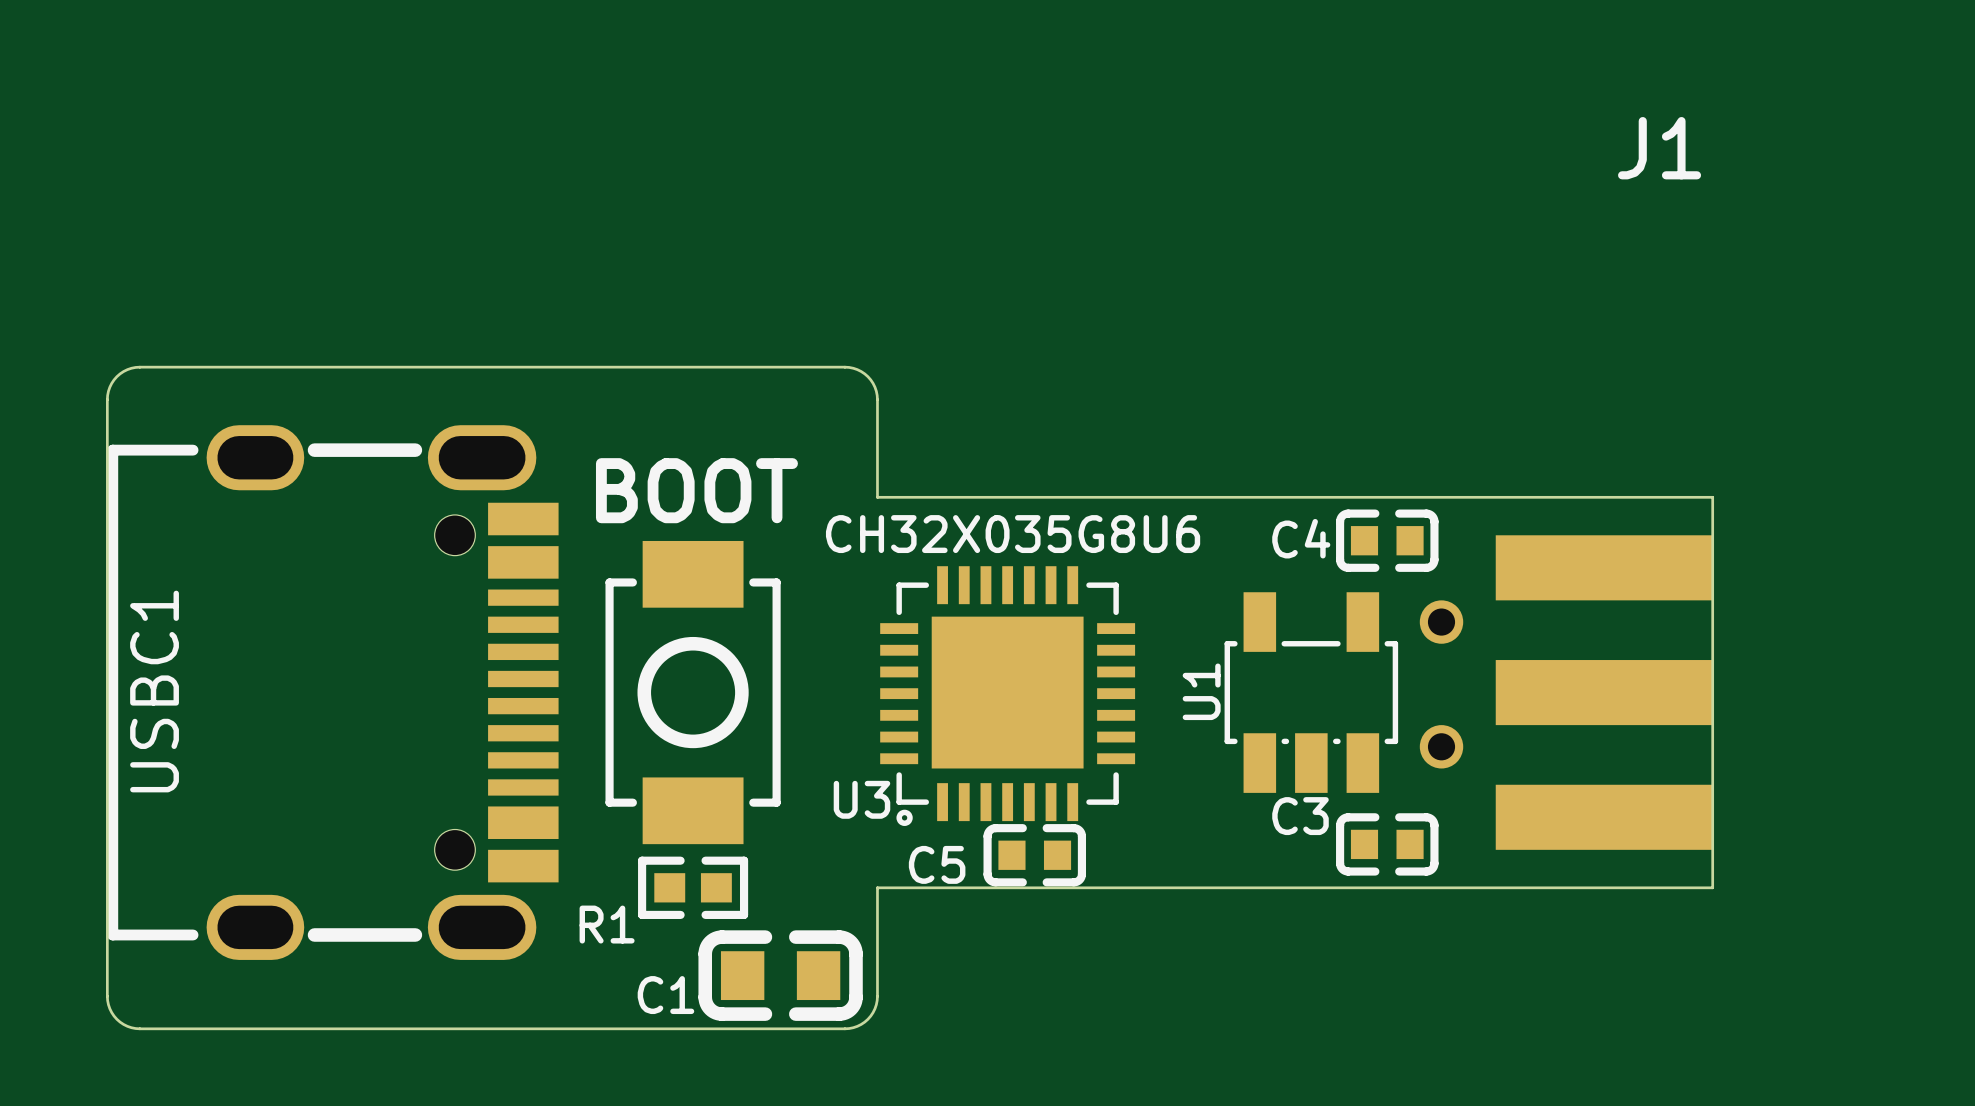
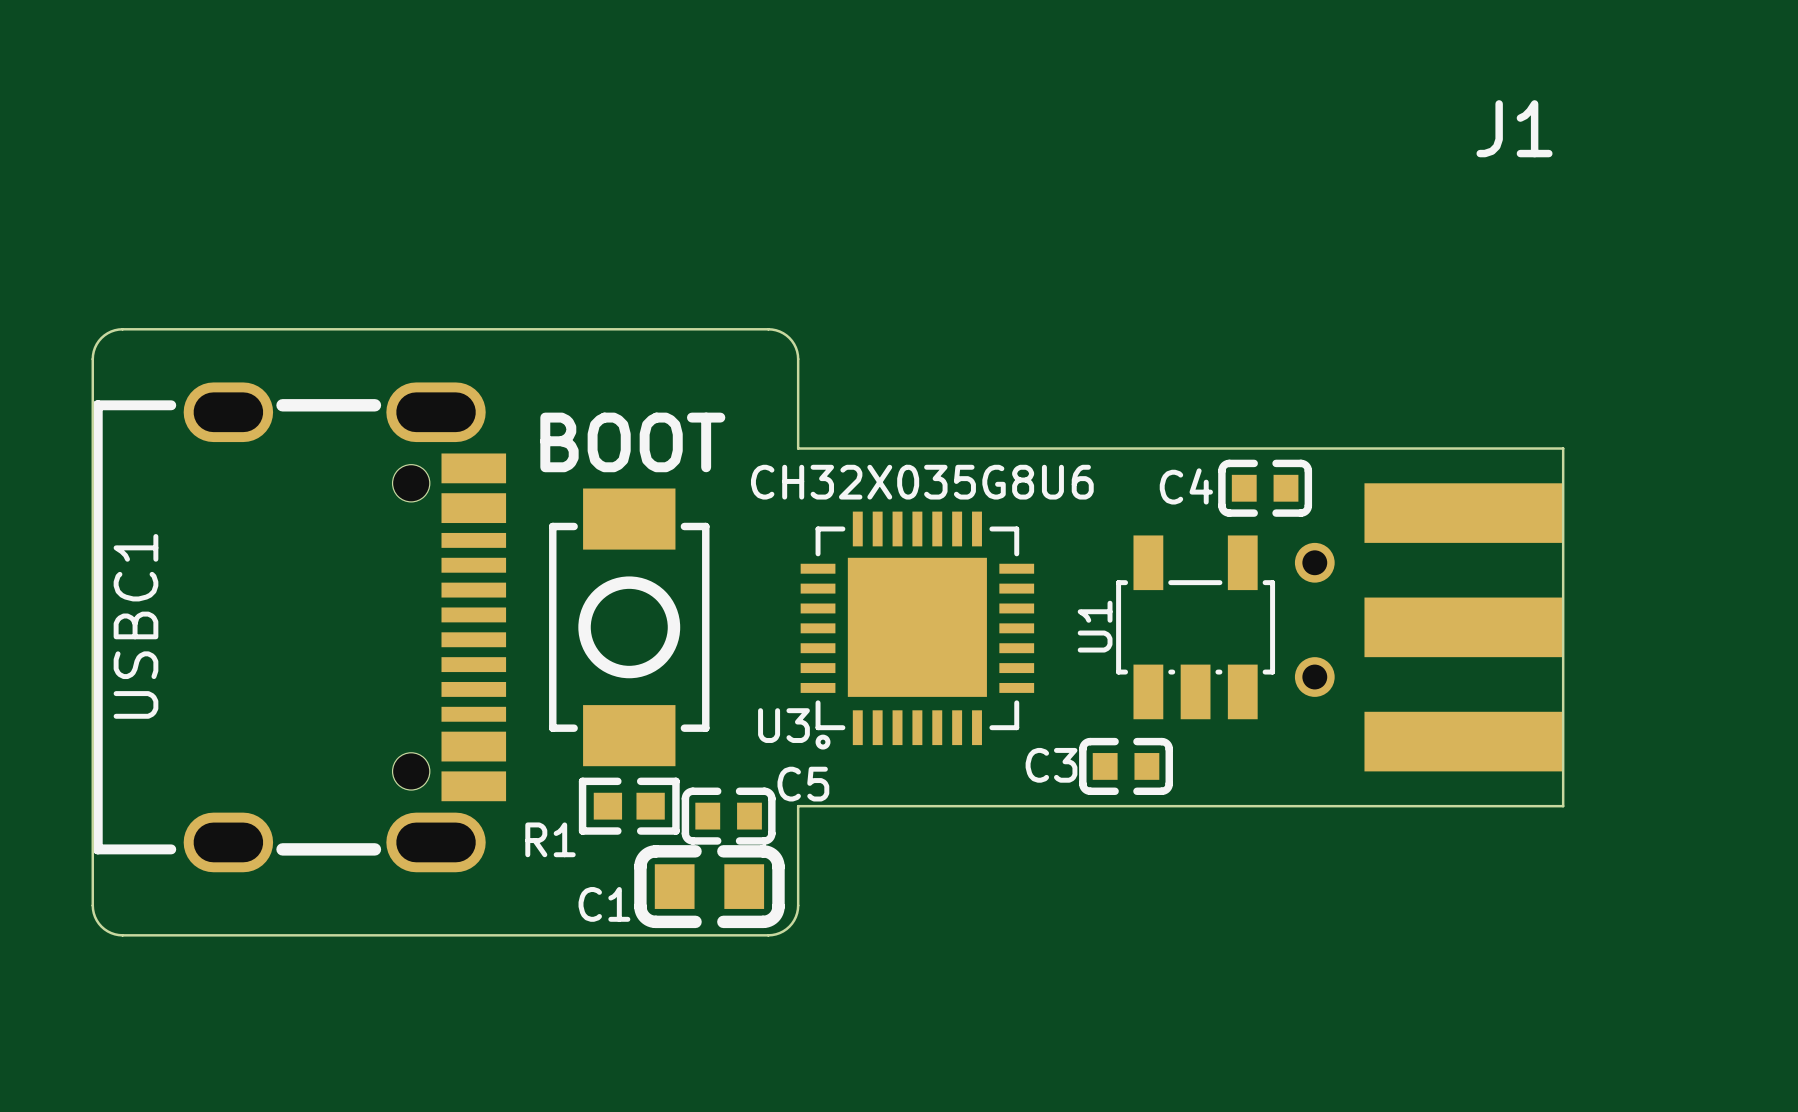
C3 name position: C3 (1300, 816) -> C3 (1051, 765)
C3 position: (1387, 844) -> (1126, 766)
C5 position: (1034, 855) -> (728, 816)
C5 name position: C5 (937, 864) -> C5 (803, 784)

